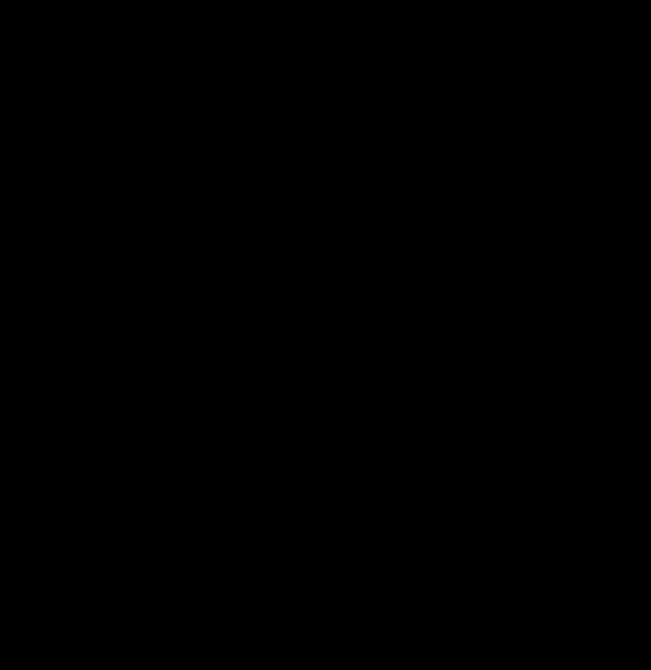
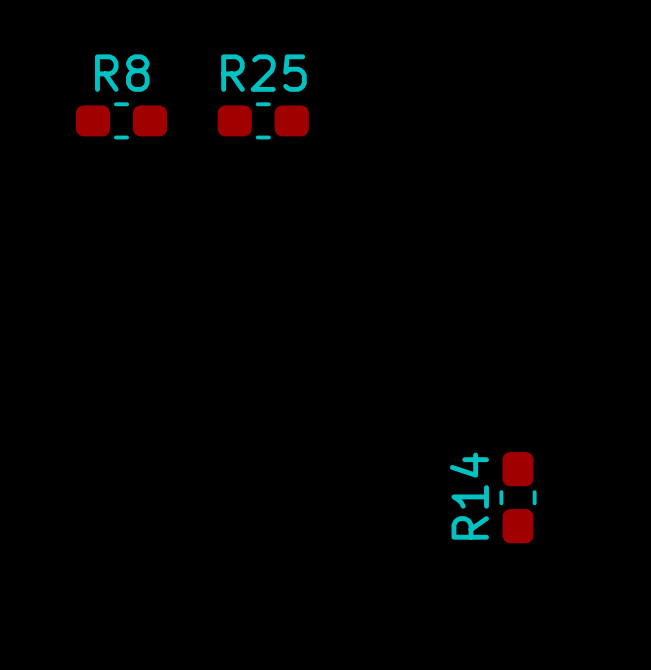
R8: none -> (121, 120)
R25: none -> (263, 120)
R14: none -> (518, 497)

